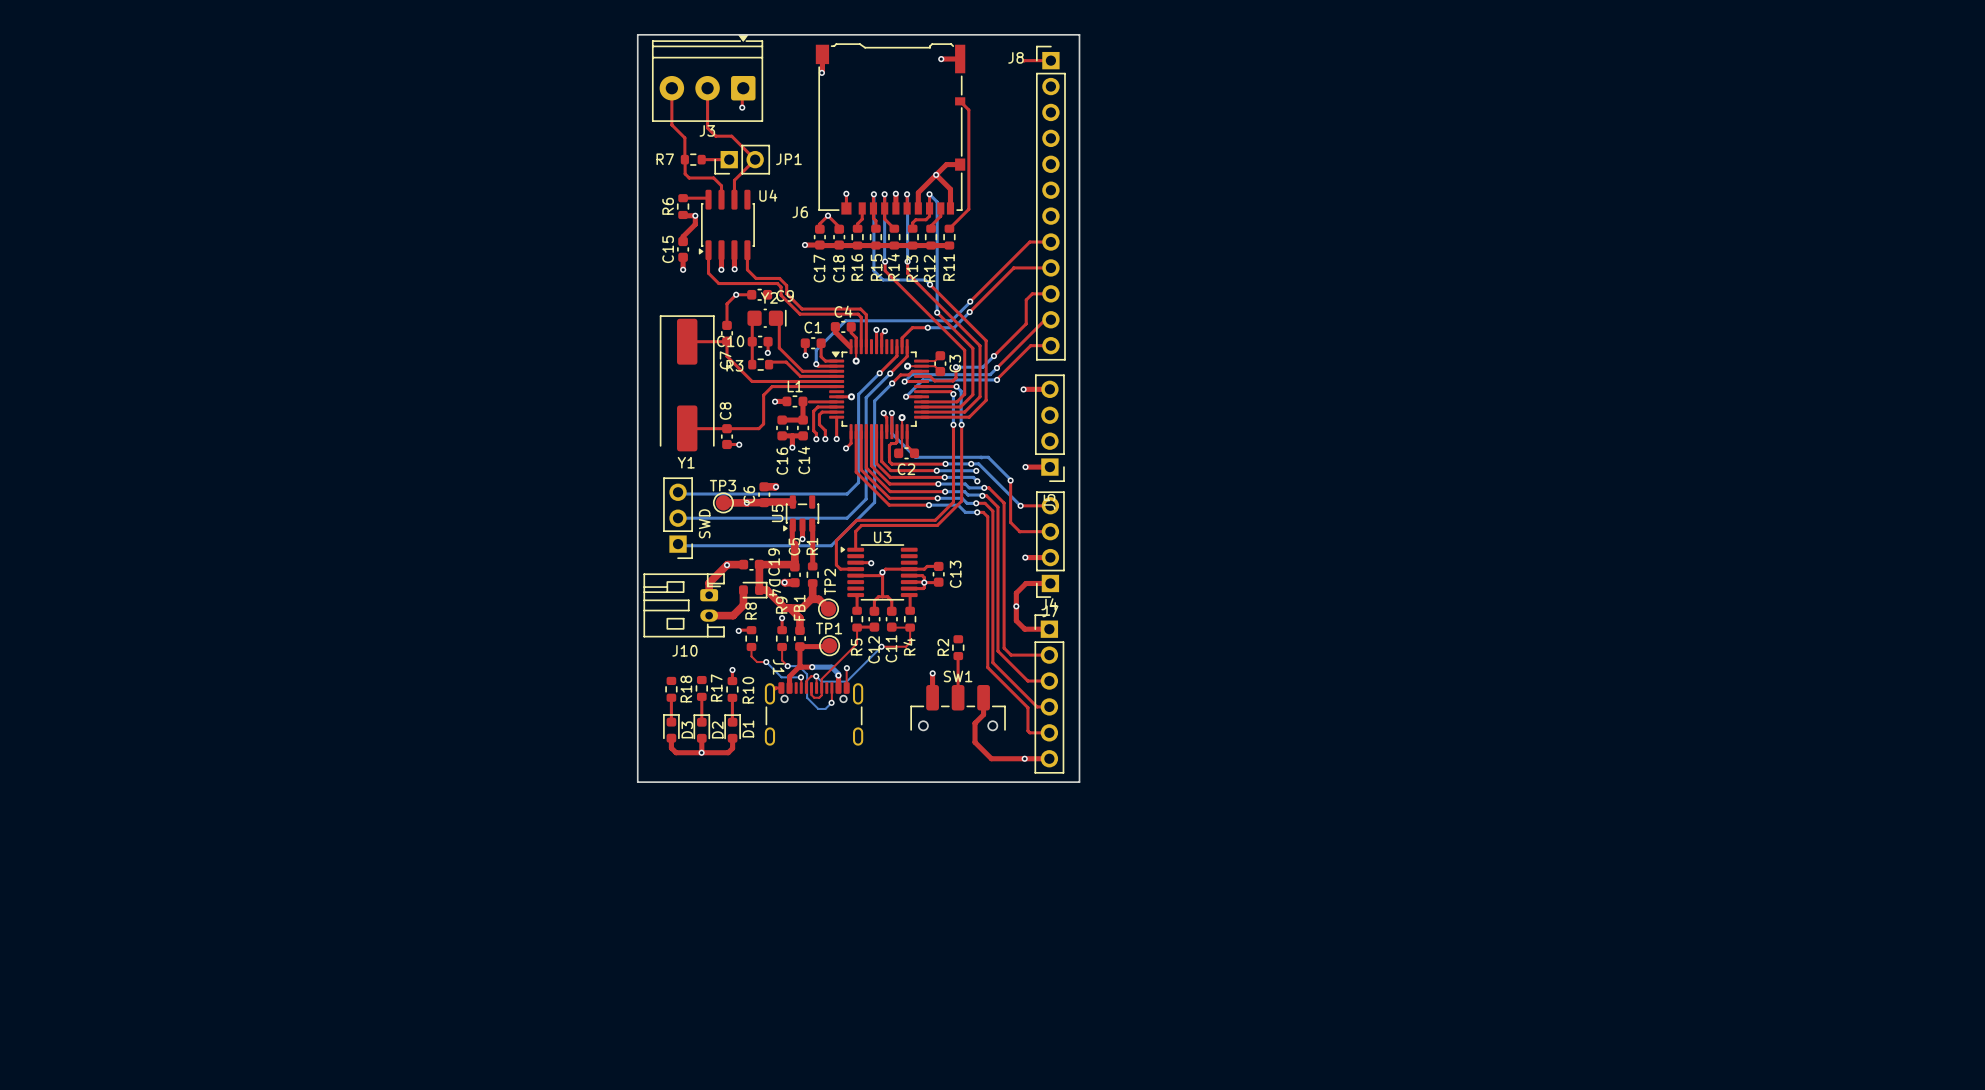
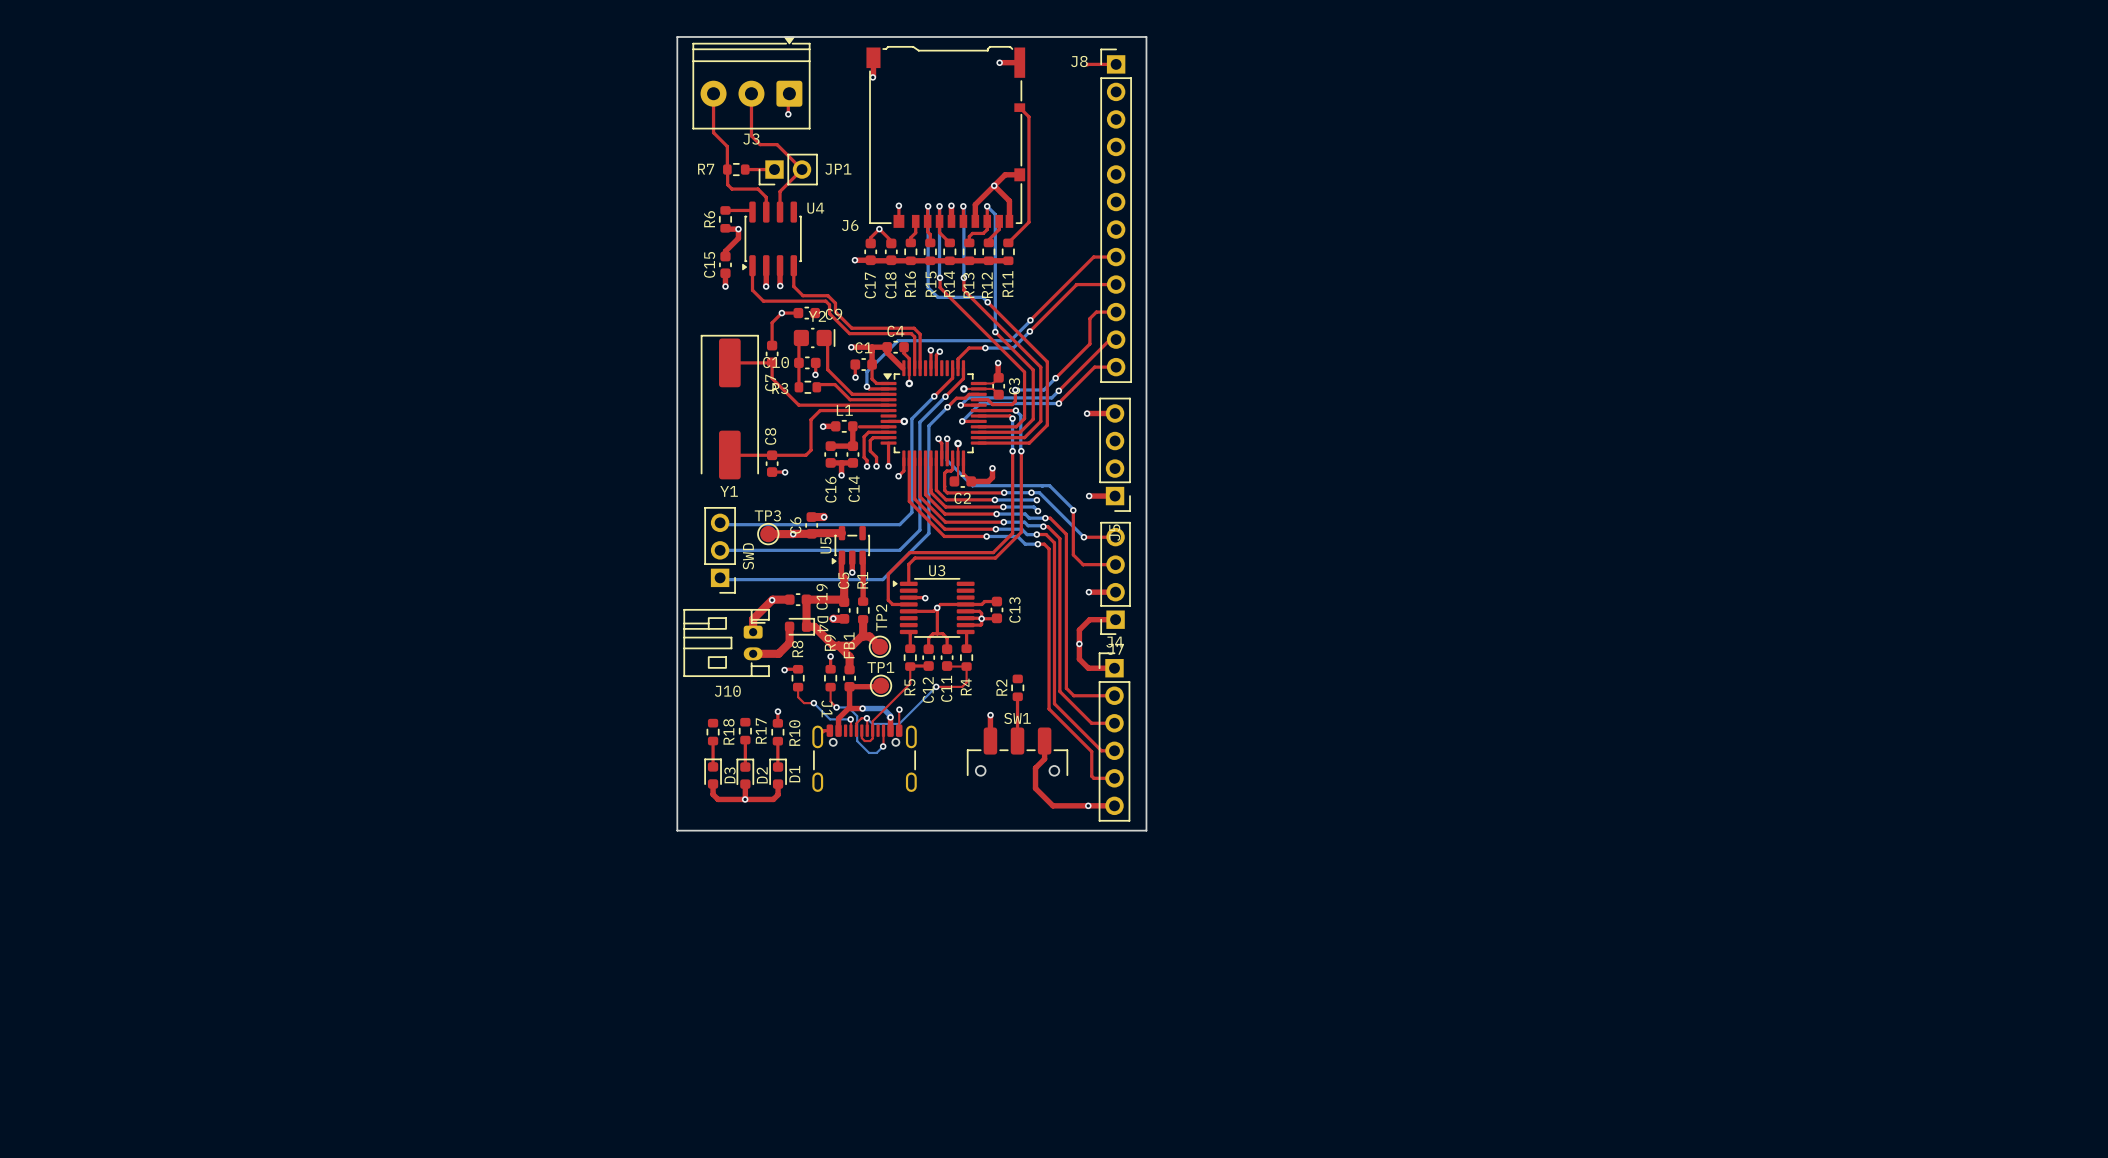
top track: none -> (851, 347) (887, 347)
via: none -> (851, 347)
top track: none -> (998, 363) (998, 377)
via: none -> (998, 363)
top track: none -> (992, 468) (992, 477) (988, 481) (971, 481)
via: none -> (992, 468)

